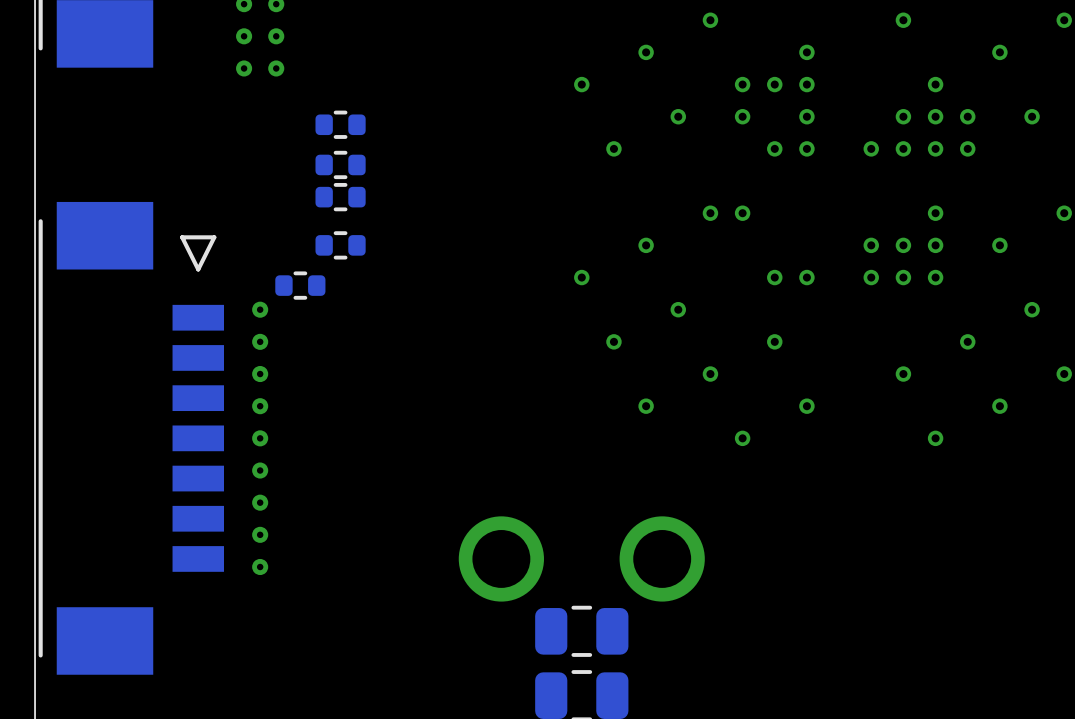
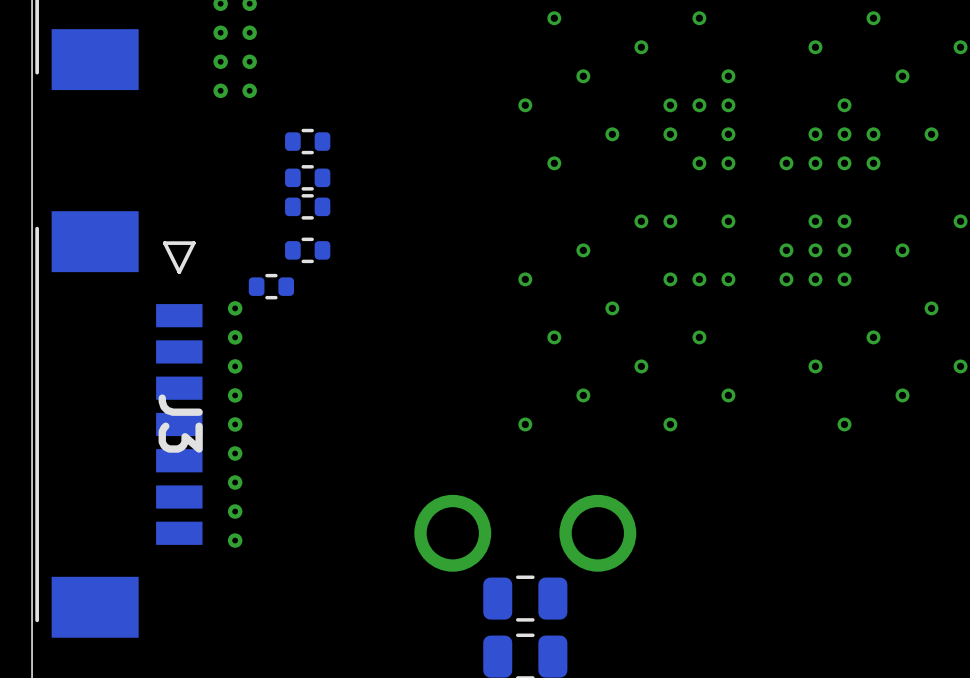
via: none -> (728, 221)
via: none -> (815, 221)
via: none -> (670, 279)
J3 name: none -> J3 (180, 423)
via: none -> (525, 424)

